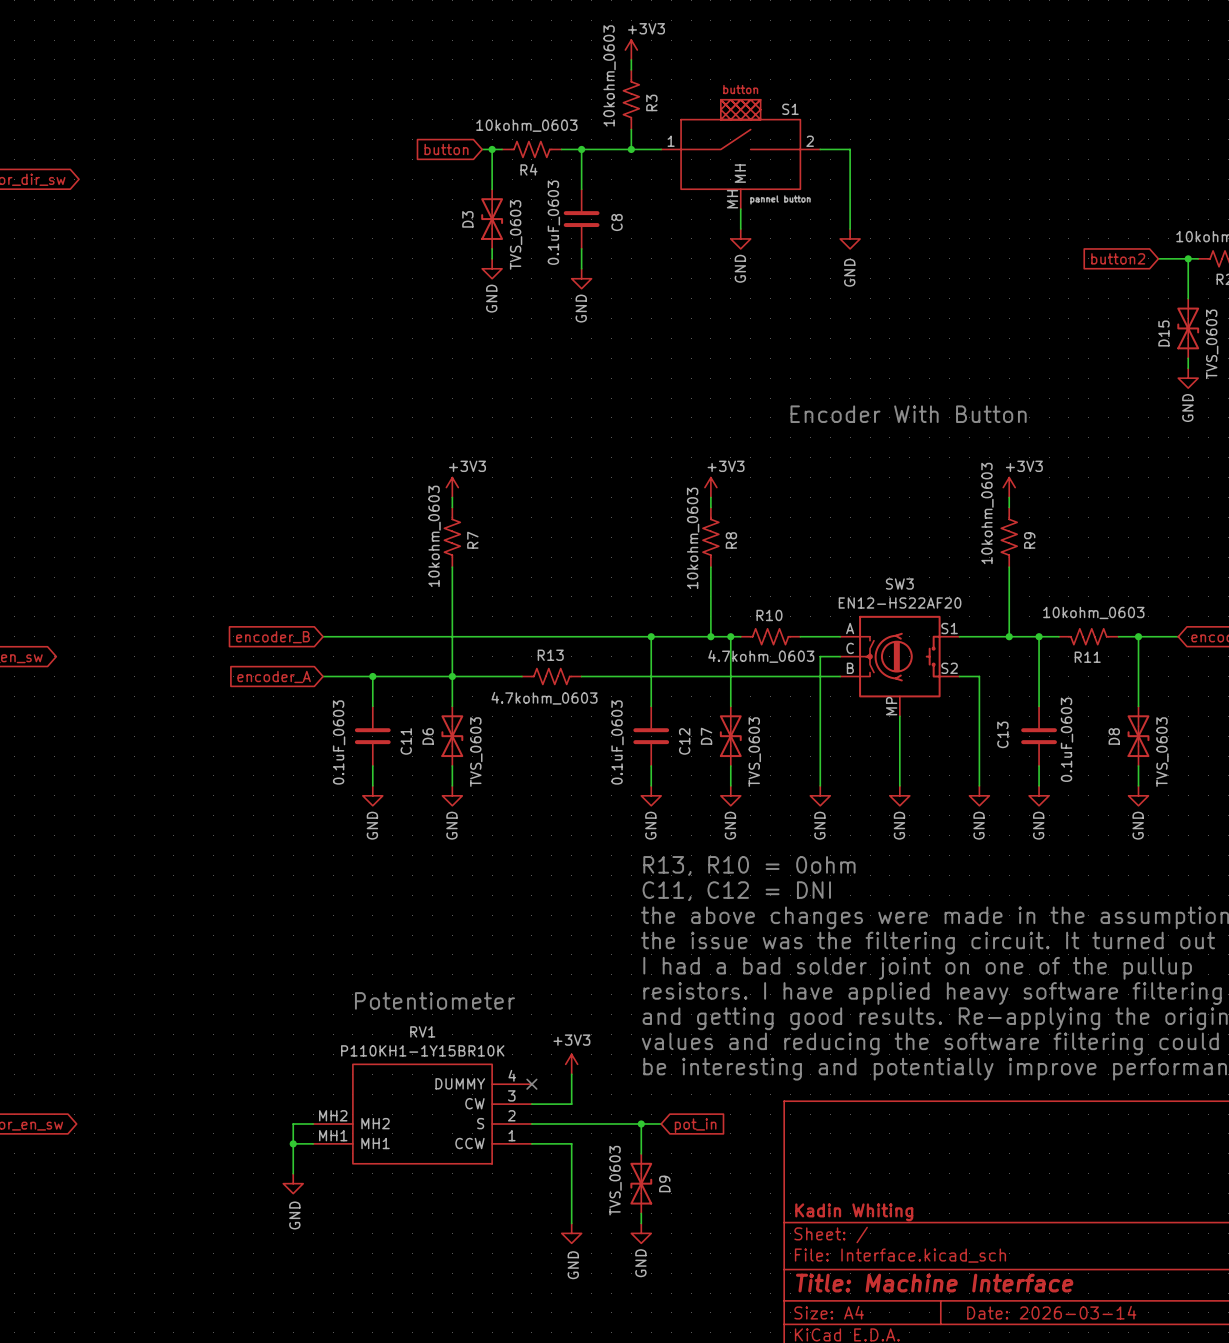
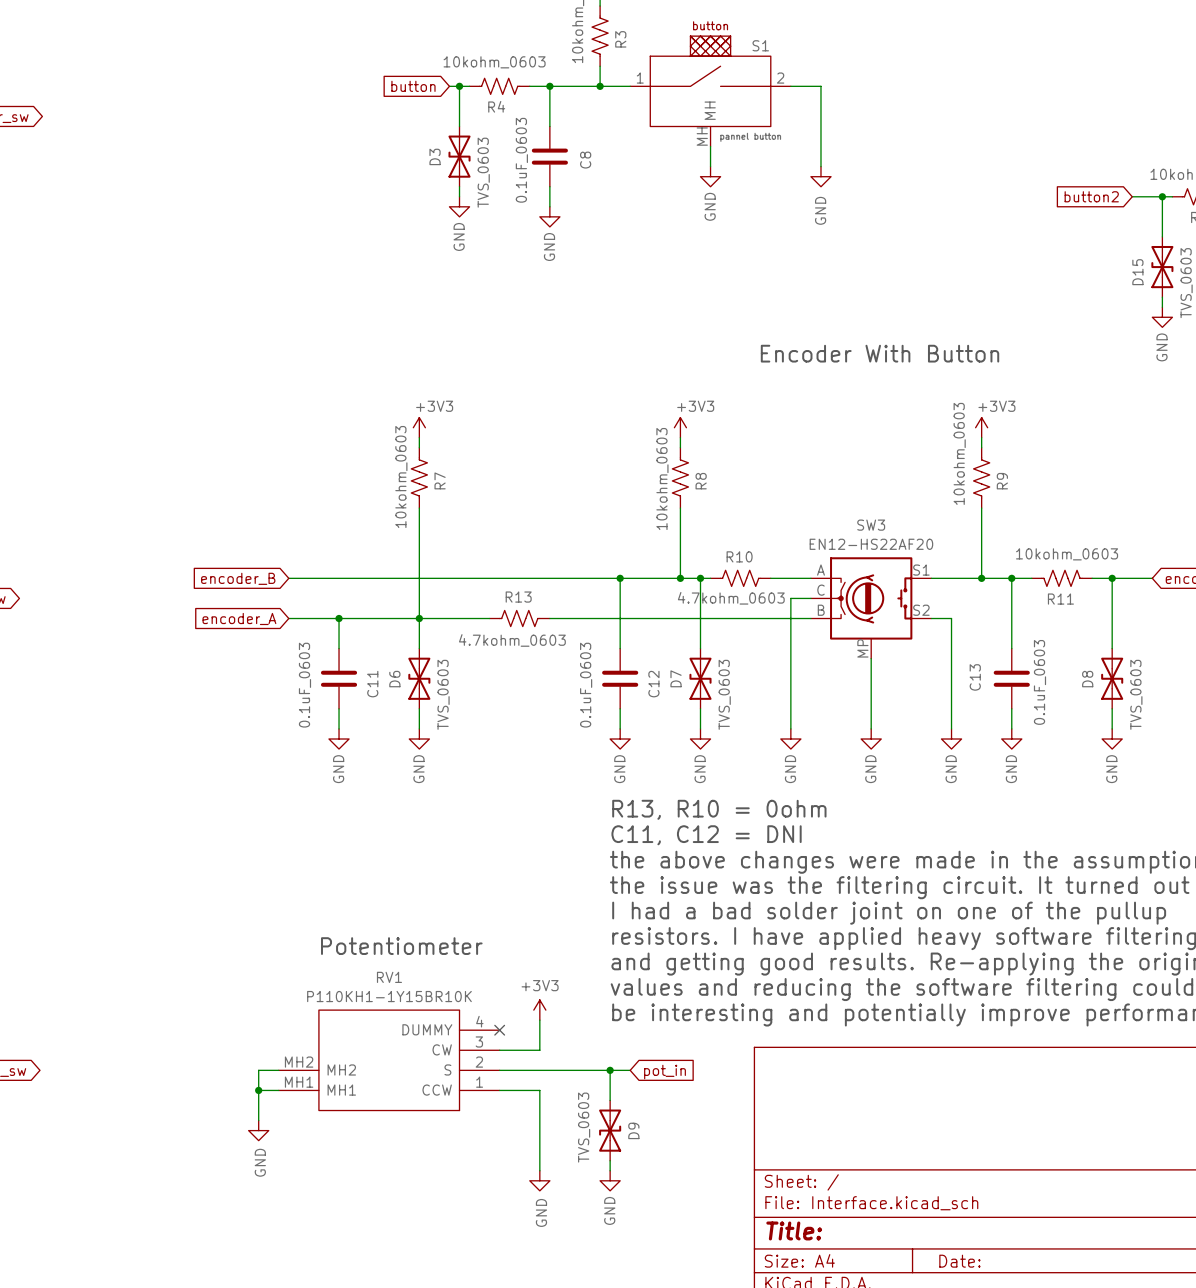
title block: Kadin Whiting (854, 1212) -> none
title block: Title: Machine Interface (934, 1283) -> Title: (794, 1230)
title block: Date: 2026-03-14 (1051, 1312) -> Date: (959, 1261)

